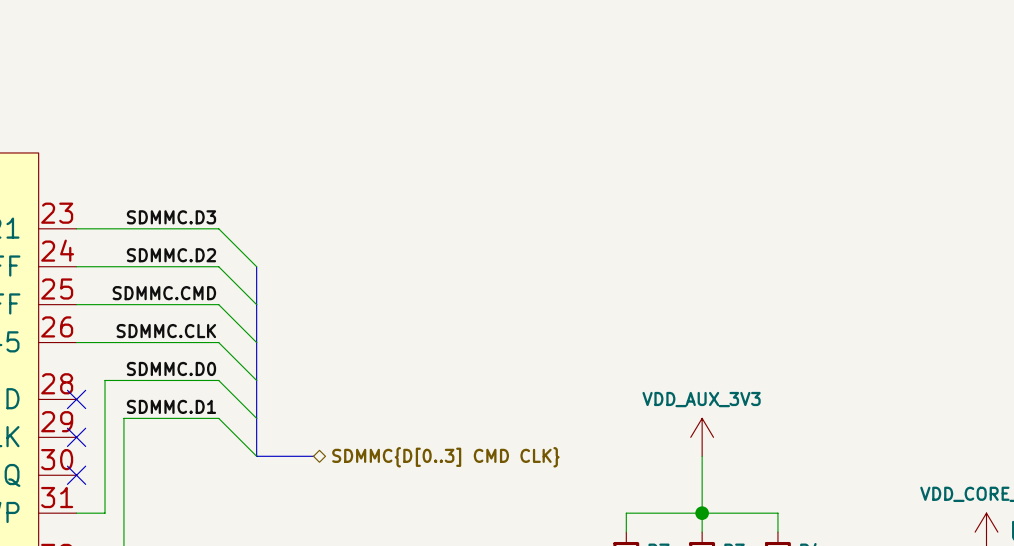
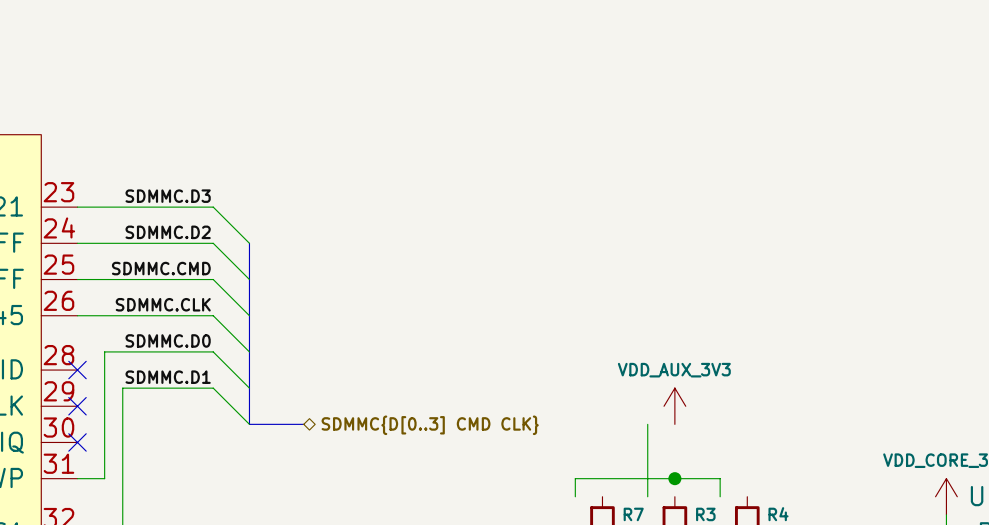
wire: (702, 456) (702, 532) -> (647, 424) (647, 496)
wire: (626, 513) (626, 532) -> (602, 478) (575, 478) (575, 496)
wire: (749, 513) (777, 513) (777, 532) -> (720, 478) (720, 496)

